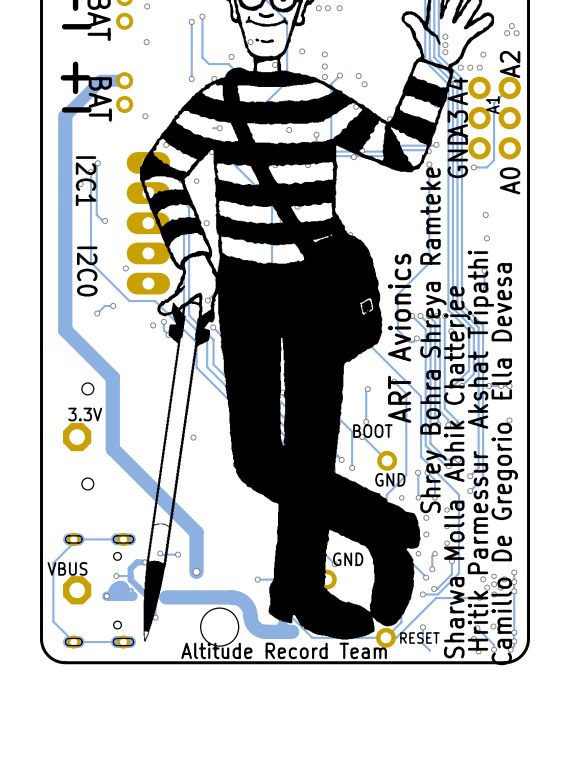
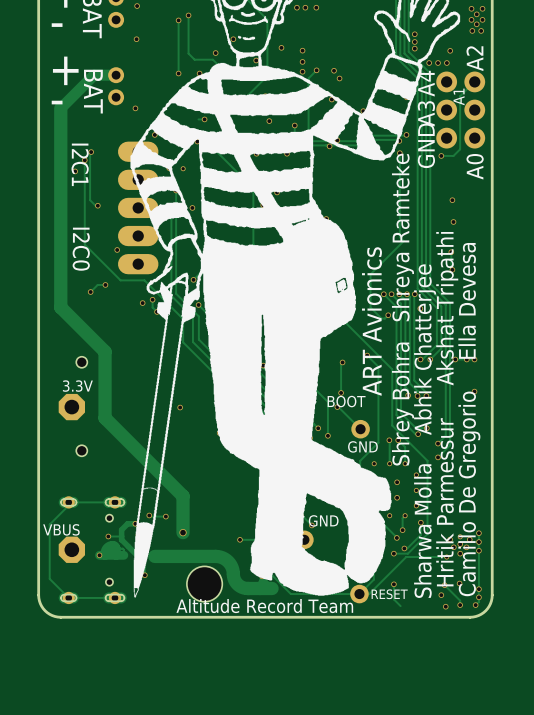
via: none -> (471, 8)
via: none -> (482, 8)
via: none -> (476, 14)
via: none -> (471, 19)
via: none -> (482, 19)

